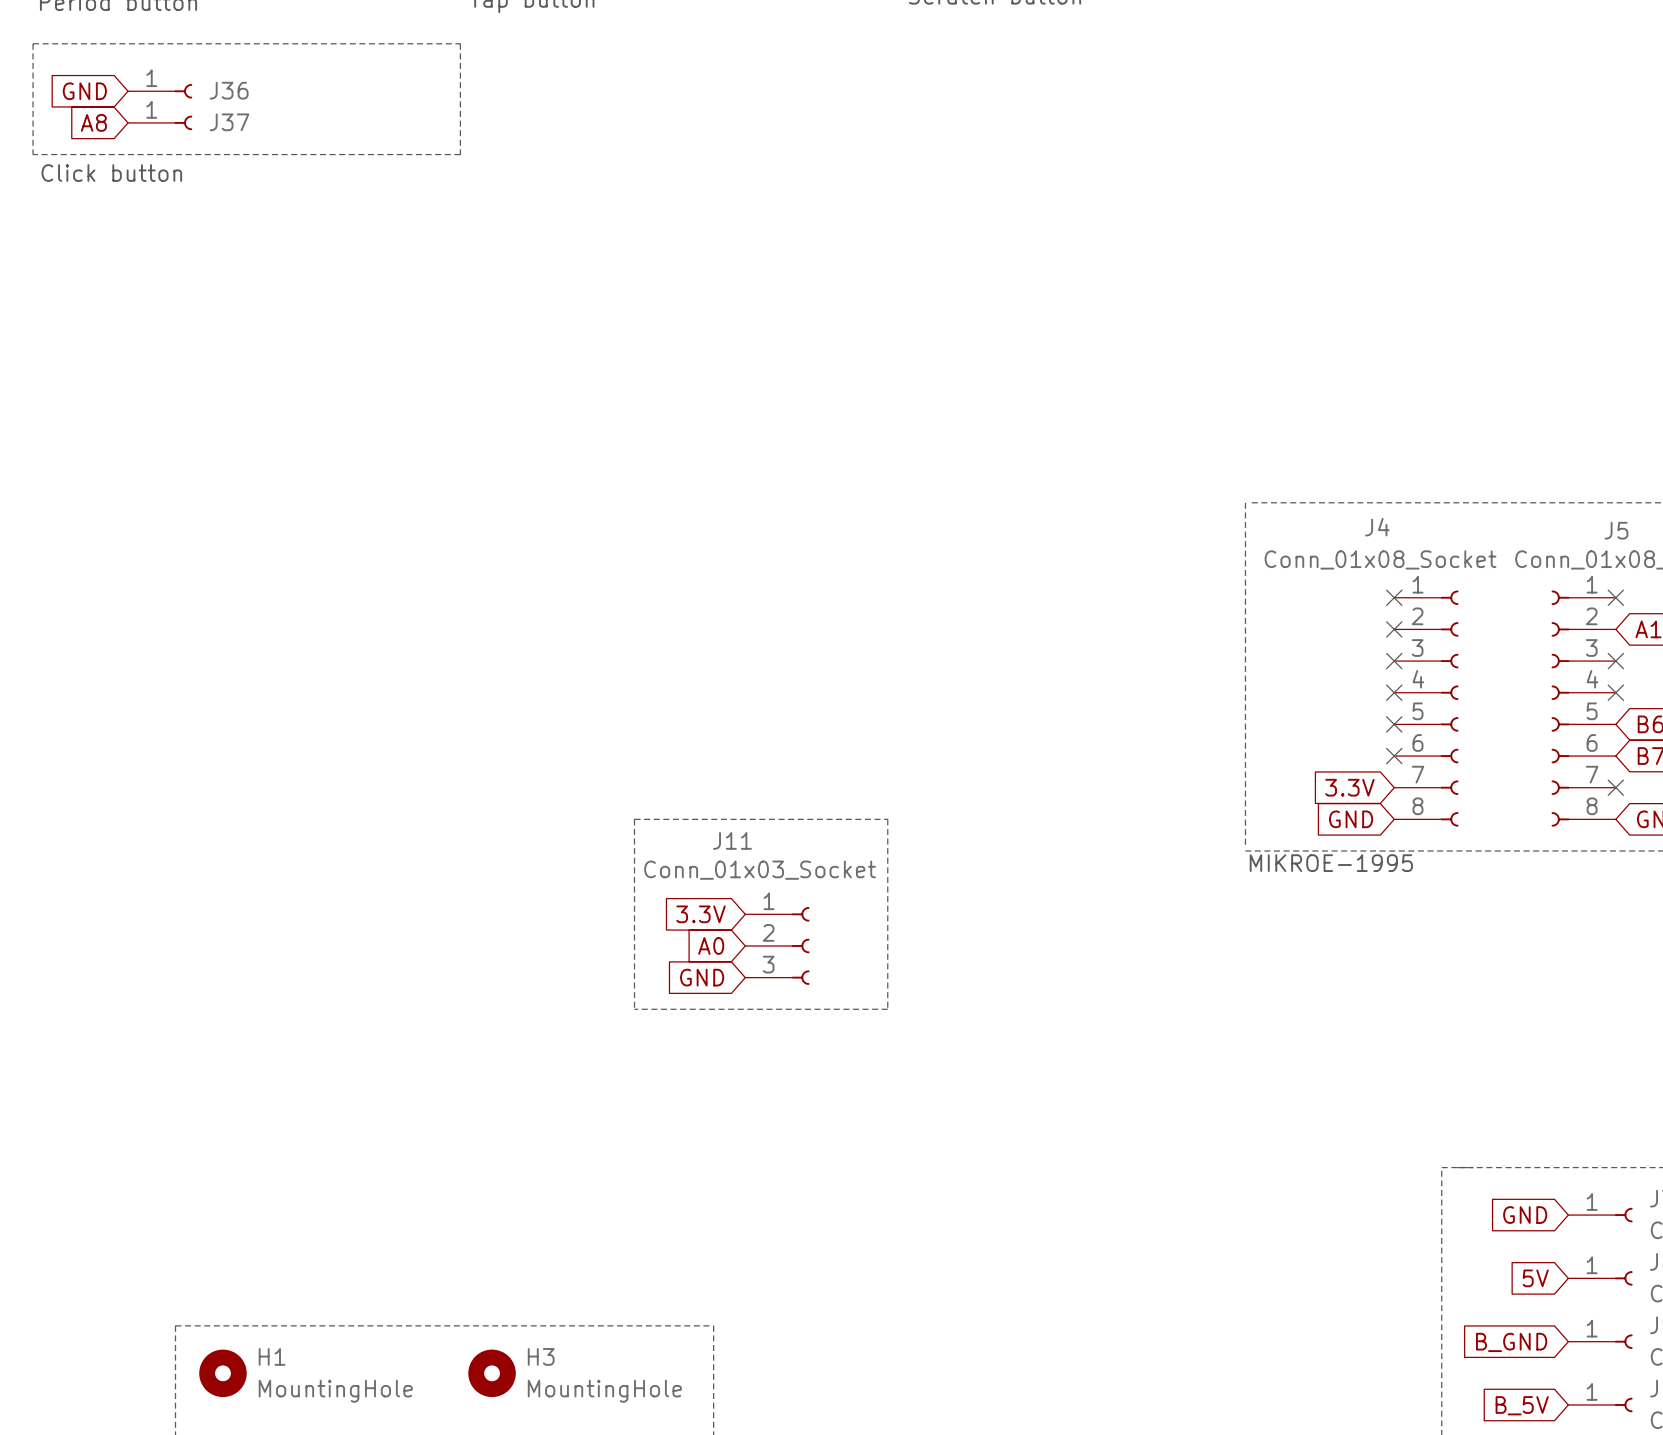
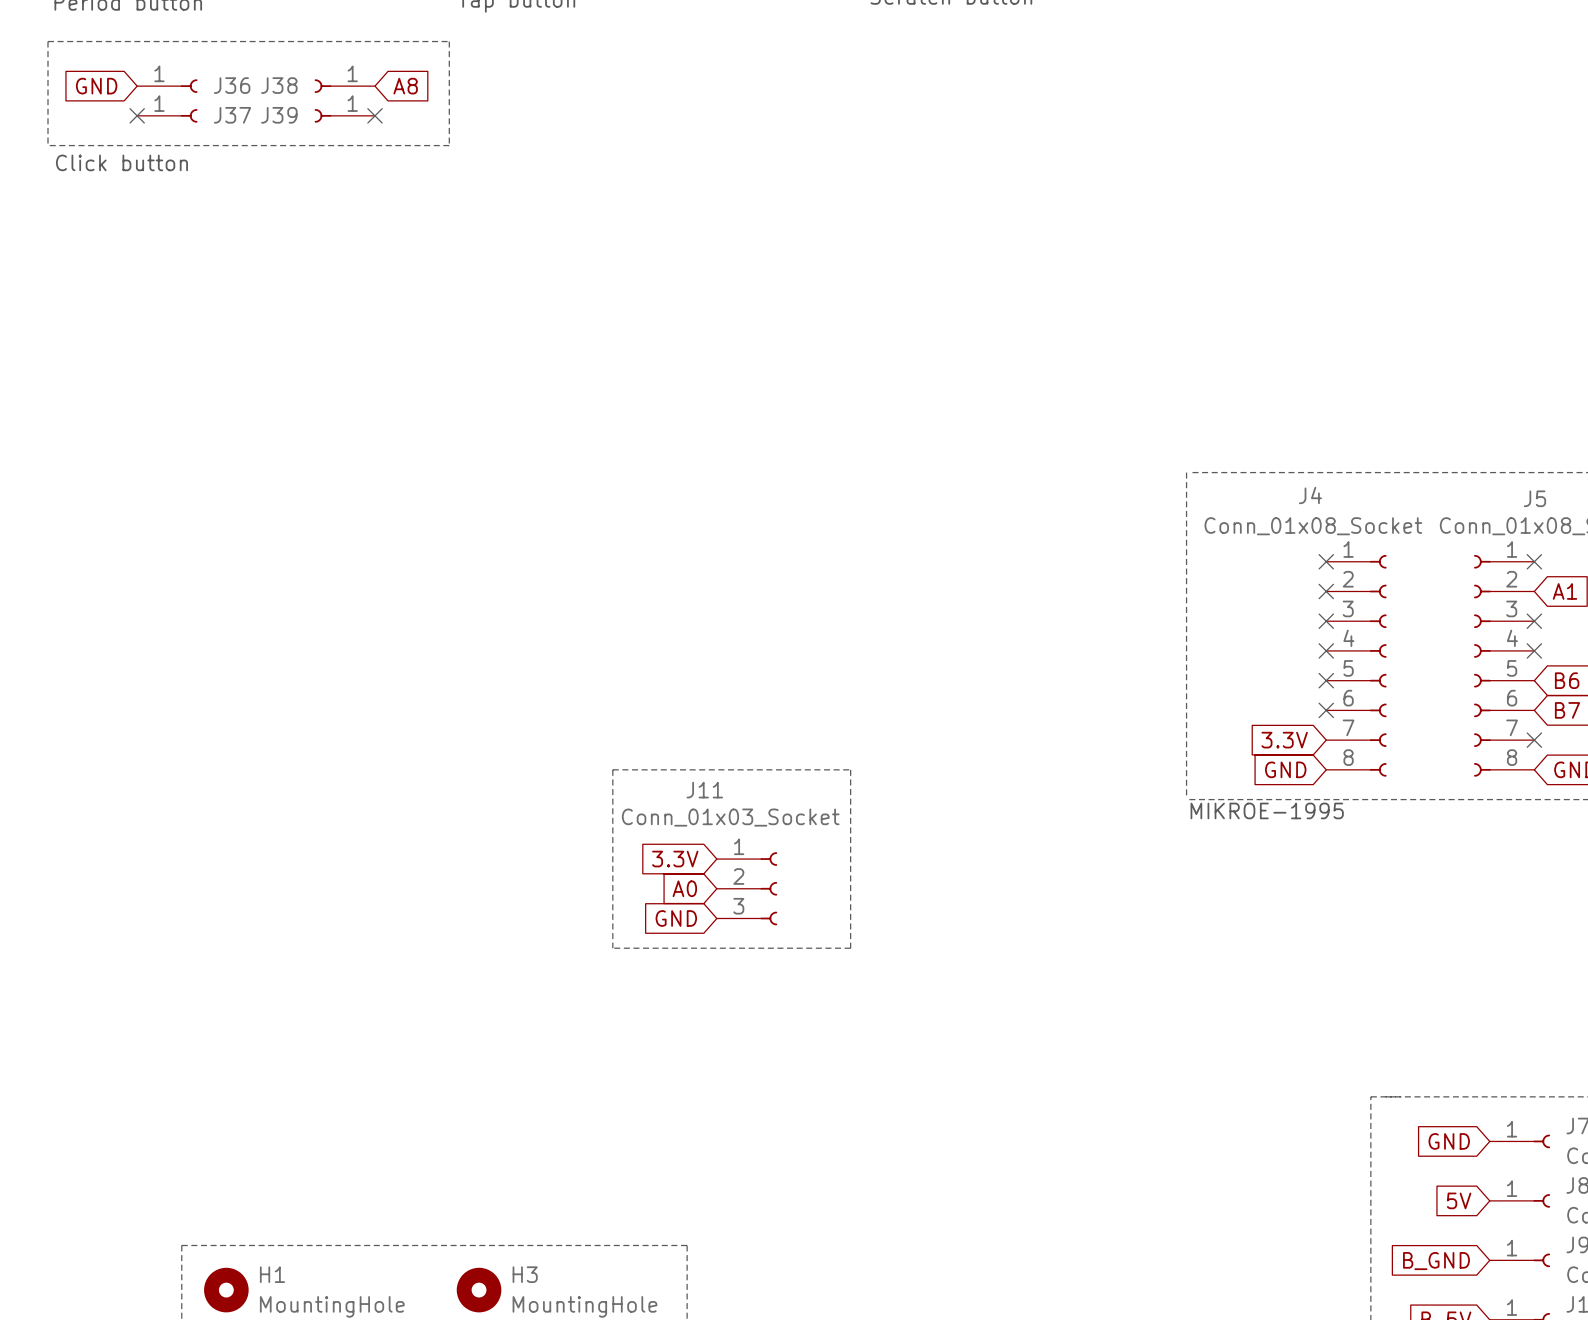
J38: none -> (344, 86)
global label rotation: 0° (93, 122) -> 180° (405, 86)
global label position: A8 (93, 122) -> A8 (405, 86)
no-connect mark: none -> (137, 115)
J39: none -> (344, 115)
no-connect mark: none -> (374, 115)

